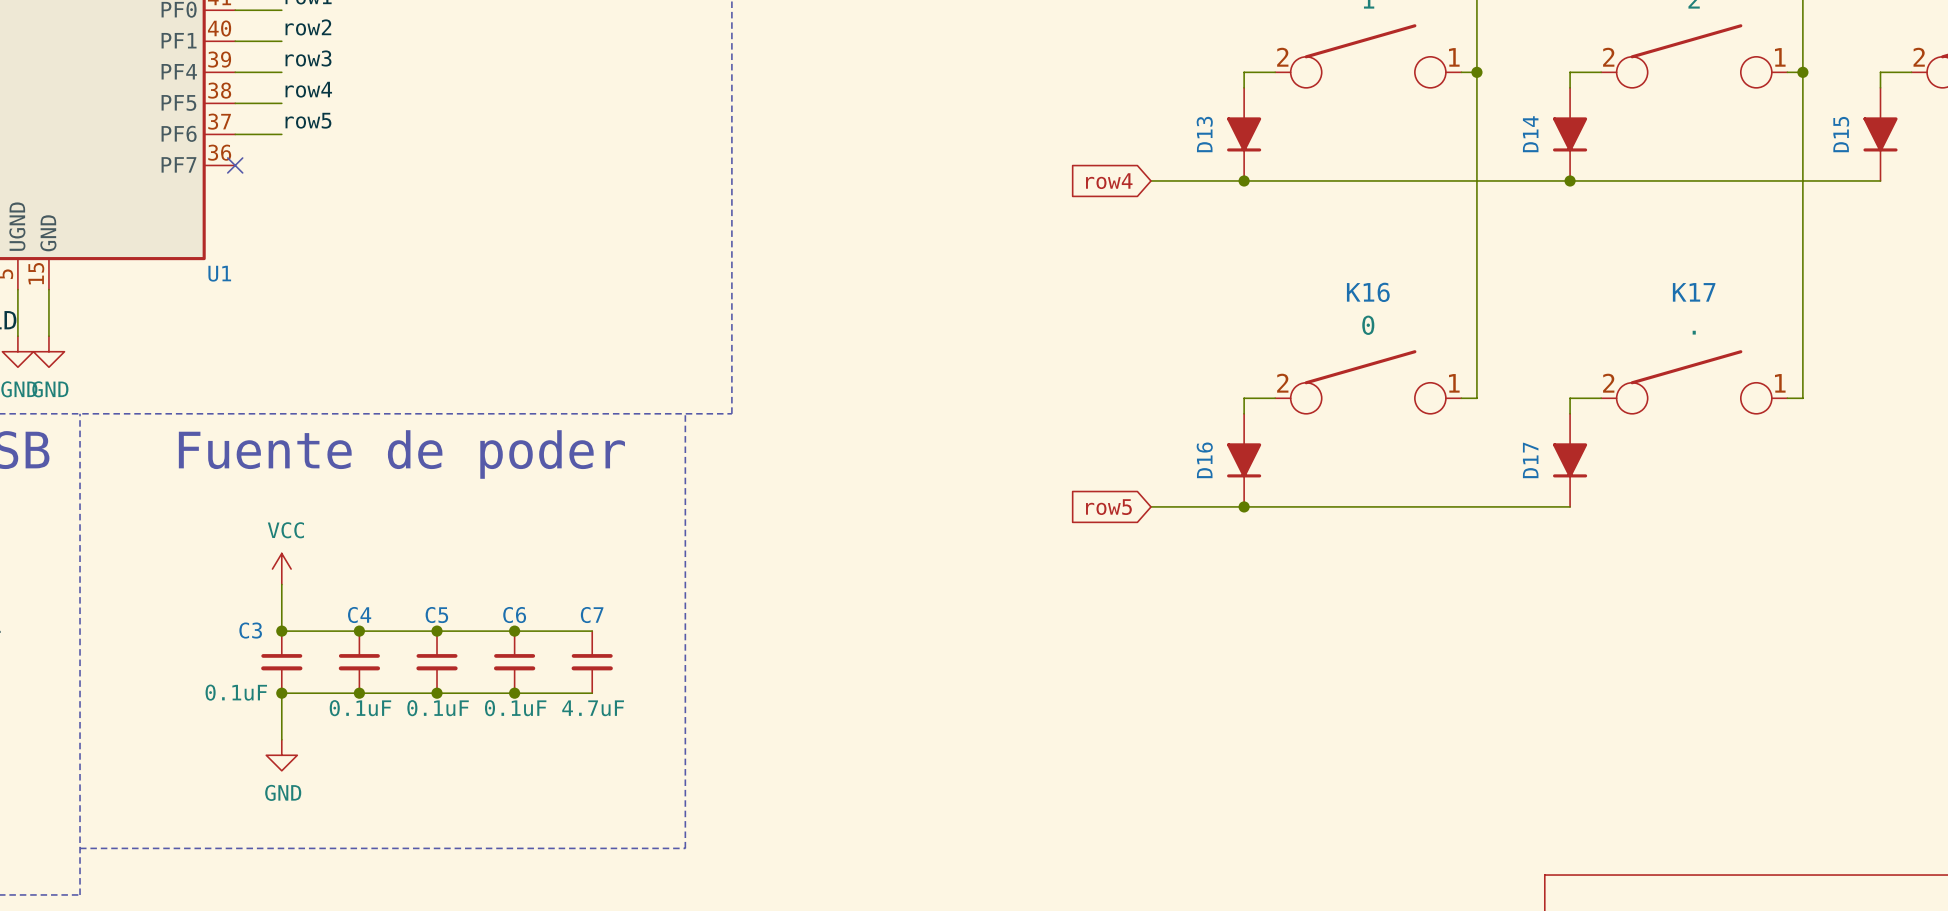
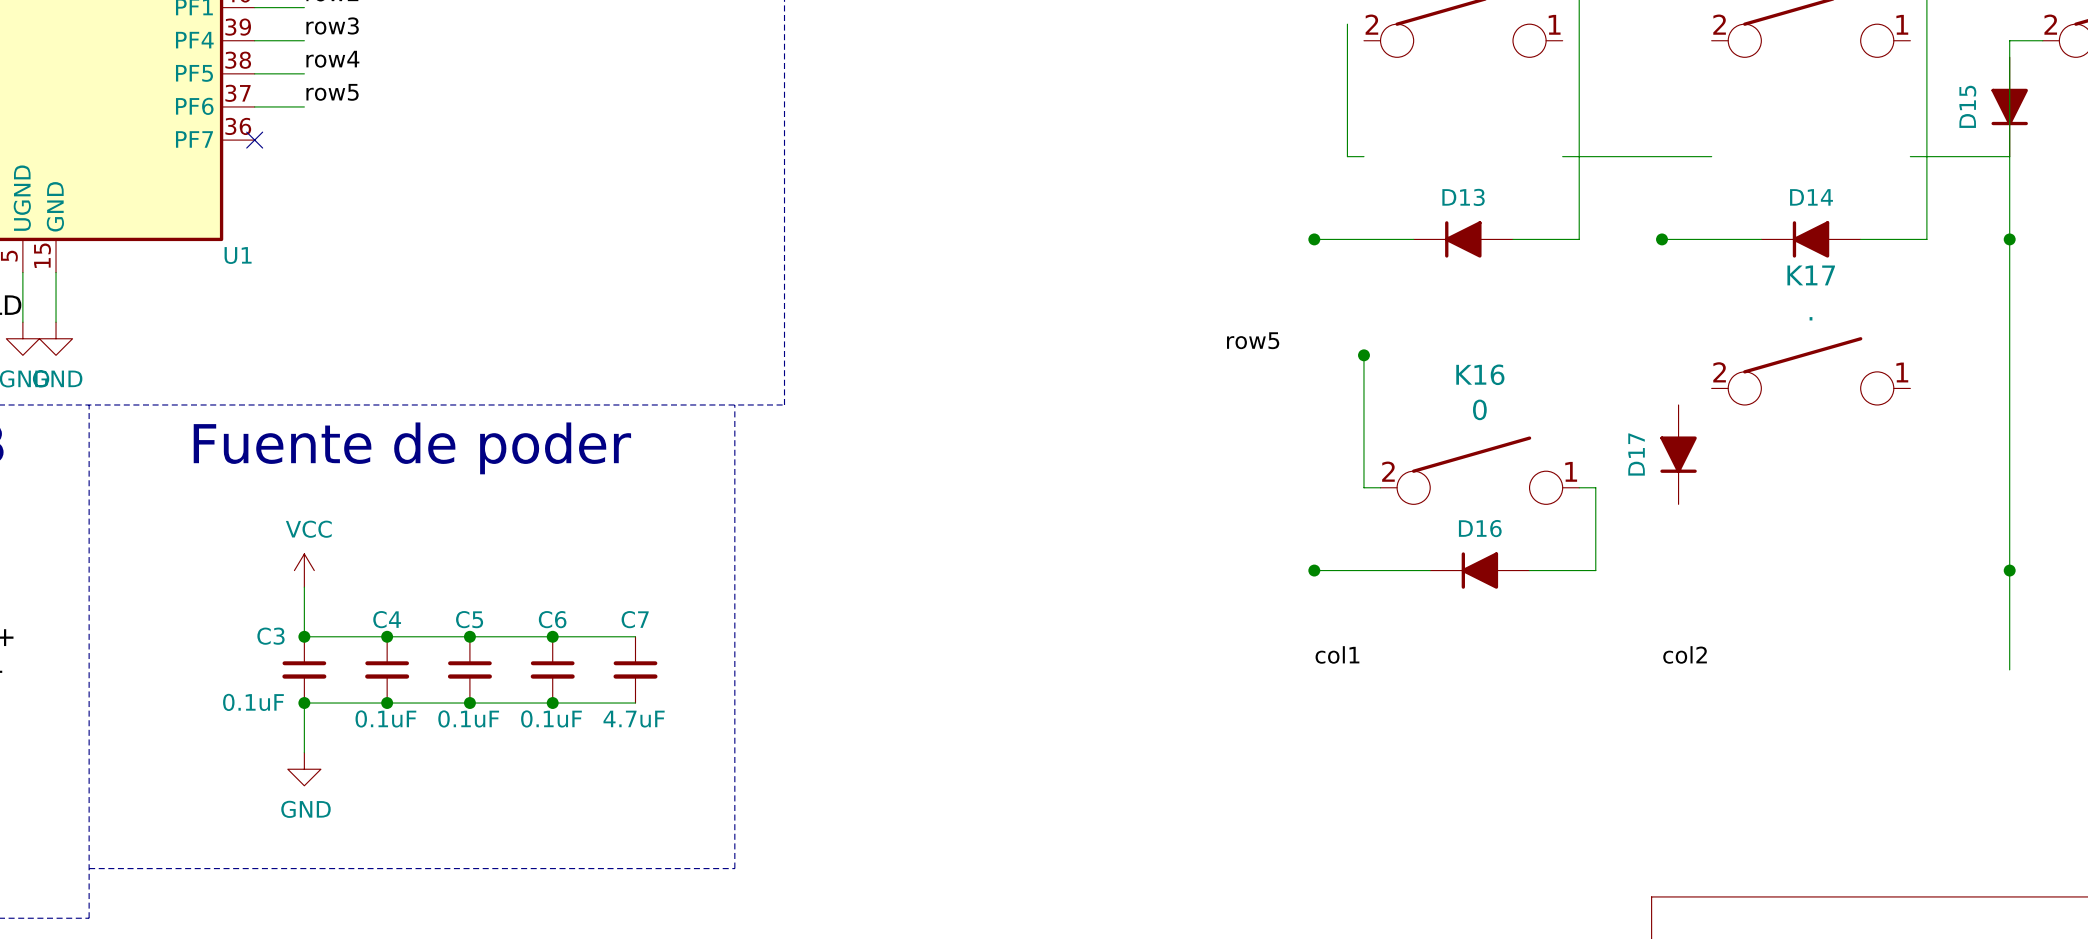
wire: (1275, 72) (1244, 72) (1244, 87) -> none
wire: (1461, 72) (1476, 72) -> none
junction: (1476, 72) -> none
wire: (1601, 72) (1570, 72) (1570, 87) -> none
wire: (1787, 72) (1802, 72) -> none
junction: (1802, 72) -> none
wire: none -> (2009, 57) (2009, 669)
D13 rotation: 0° (1244, 134) -> 90° clockwise (1463, 239)
D13 position: (1244, 134) -> (1463, 239)
D14 rotation: 0° (1570, 134) -> 90° clockwise (1811, 239)
D14 position: (1570, 134) -> (1811, 239)
wire: (1150, 180) (1259, 180) -> (1347, 24) (1347, 156)
junction: (1244, 180) -> none
wire: (1275, 180) (1461, 180) -> none
junction: (1570, 180) -> none
wire: (1601, 180) (1787, 180) -> none
global label: row4 (1109, 181) -> none
wire: none -> (1314, 239) (1413, 239)
junction: none -> (1314, 239)
wire: (1476, 258) (1476, 398) (1461, 398) -> (1579, 239) (1512, 239)
wire: none -> (1662, 239) (1761, 239)
junction: none -> (1662, 239)
wire: (1802, 258) (1802, 398) (1787, 398) -> (1926, 239) (1860, 239)
junction: none -> (2009, 239)
label: none -> row5 (1253, 340)
wire: none -> (1363, 355) (1363, 487) (1380, 487)
junction: none -> (1363, 355)
K16 position: (1368, 381) -> (1479, 470)
wire: (1275, 398) (1244, 398) (1244, 413) -> none
wire: (1601, 398) (1570, 398) (1570, 413) -> none
D16 rotation: 0° (1244, 460) -> 90° clockwise (1479, 570)
D16 position: (1244, 460) -> (1479, 570)
wire: none -> (1579, 487) (1595, 487) (1595, 570) (1529, 570)
wire: (1150, 506) (1570, 506) -> none
junction position: (1244, 506) -> (1314, 570)
global label: row5 (1108, 507) -> none
wire: none -> (1314, 570) (1430, 570)
junction: none -> (2009, 570)
label: none -> col1 (1337, 654)
label: none -> col2 (1685, 654)

